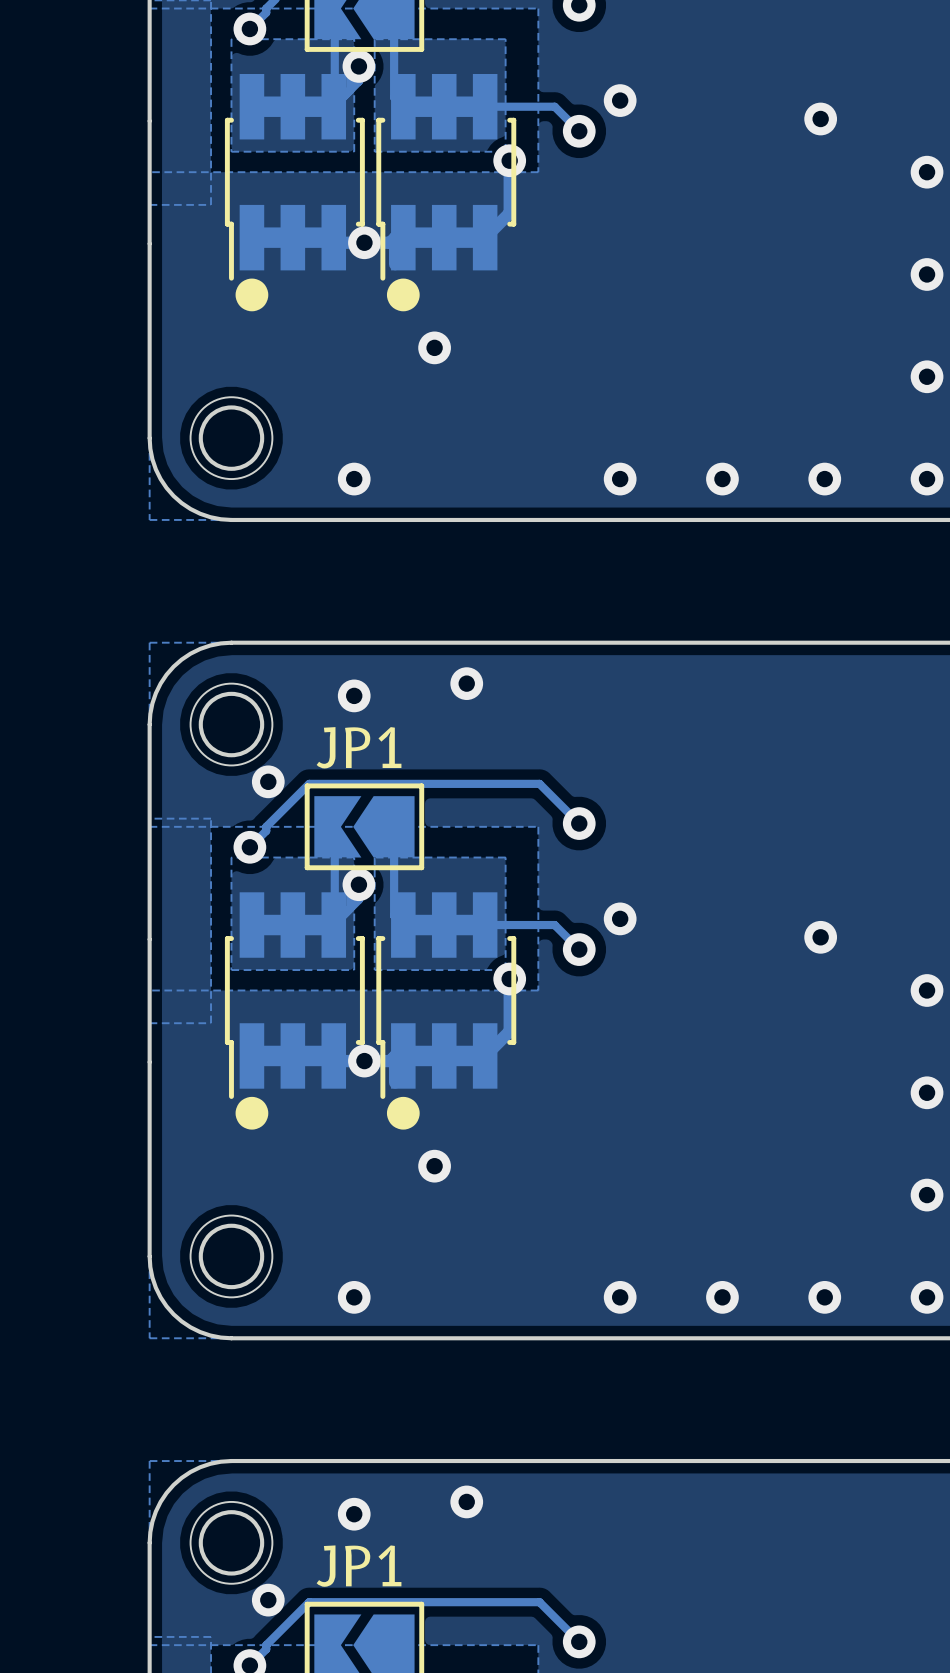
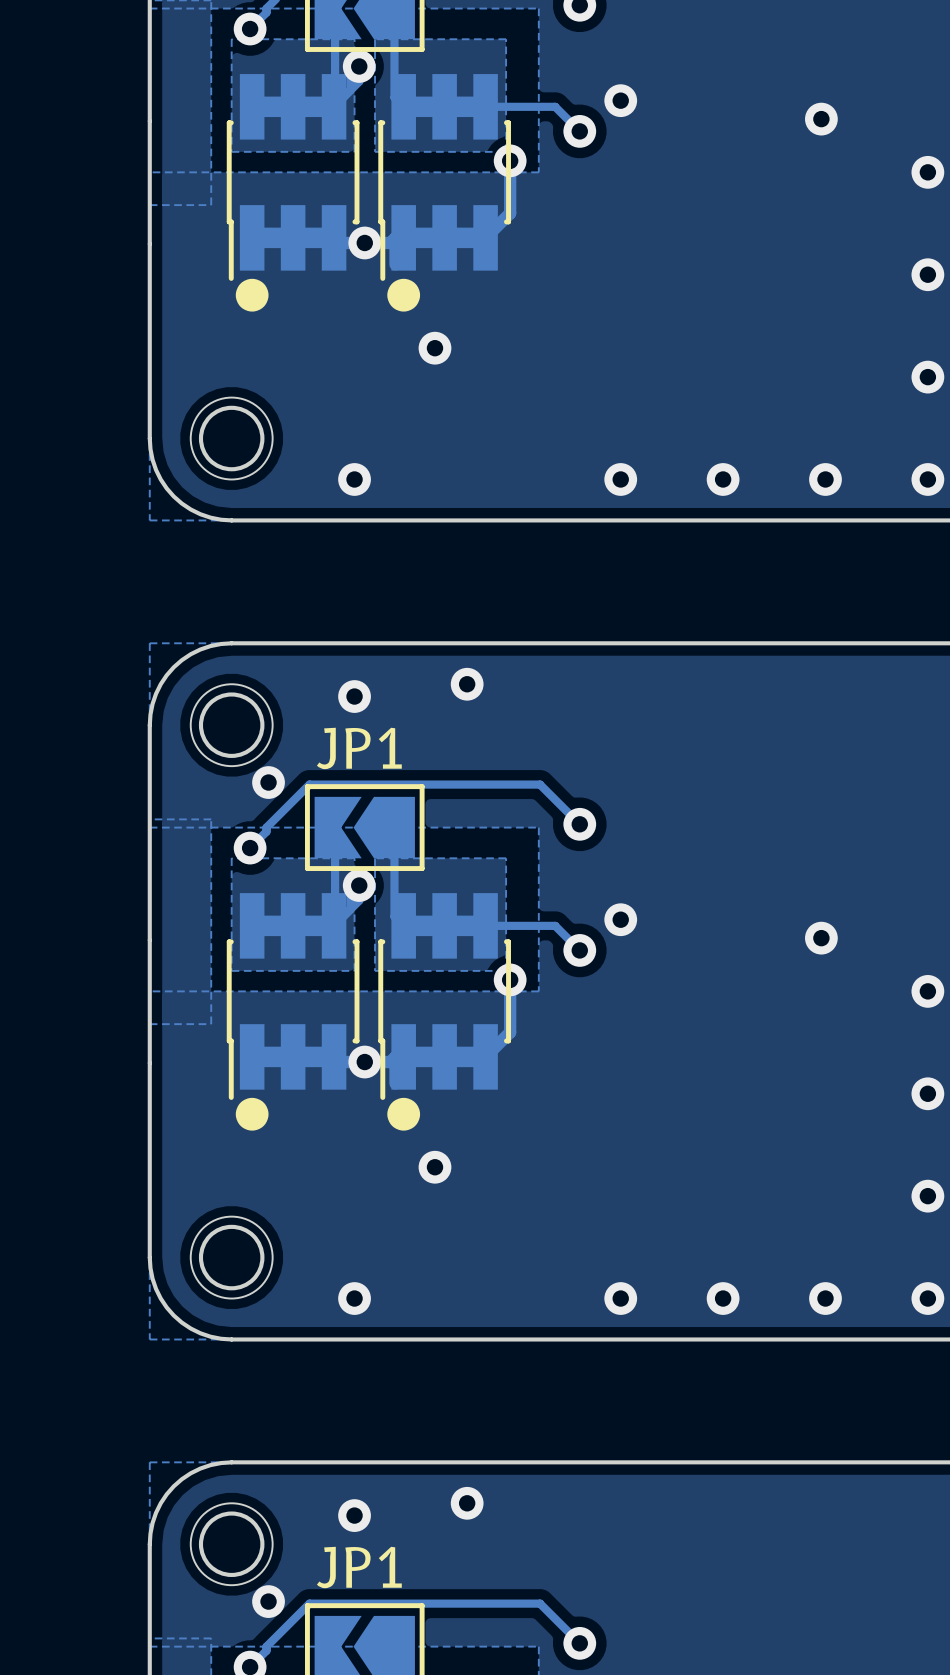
part footprint: [224, 73, 365, 312] -> [226, 74, 360, 312]
part footprint: [376, 73, 517, 312] -> [378, 74, 511, 312]
part footprint: [224, 892, 365, 1130] -> [226, 893, 360, 1131]
part footprint: [376, 892, 517, 1130] -> [378, 893, 511, 1131]

